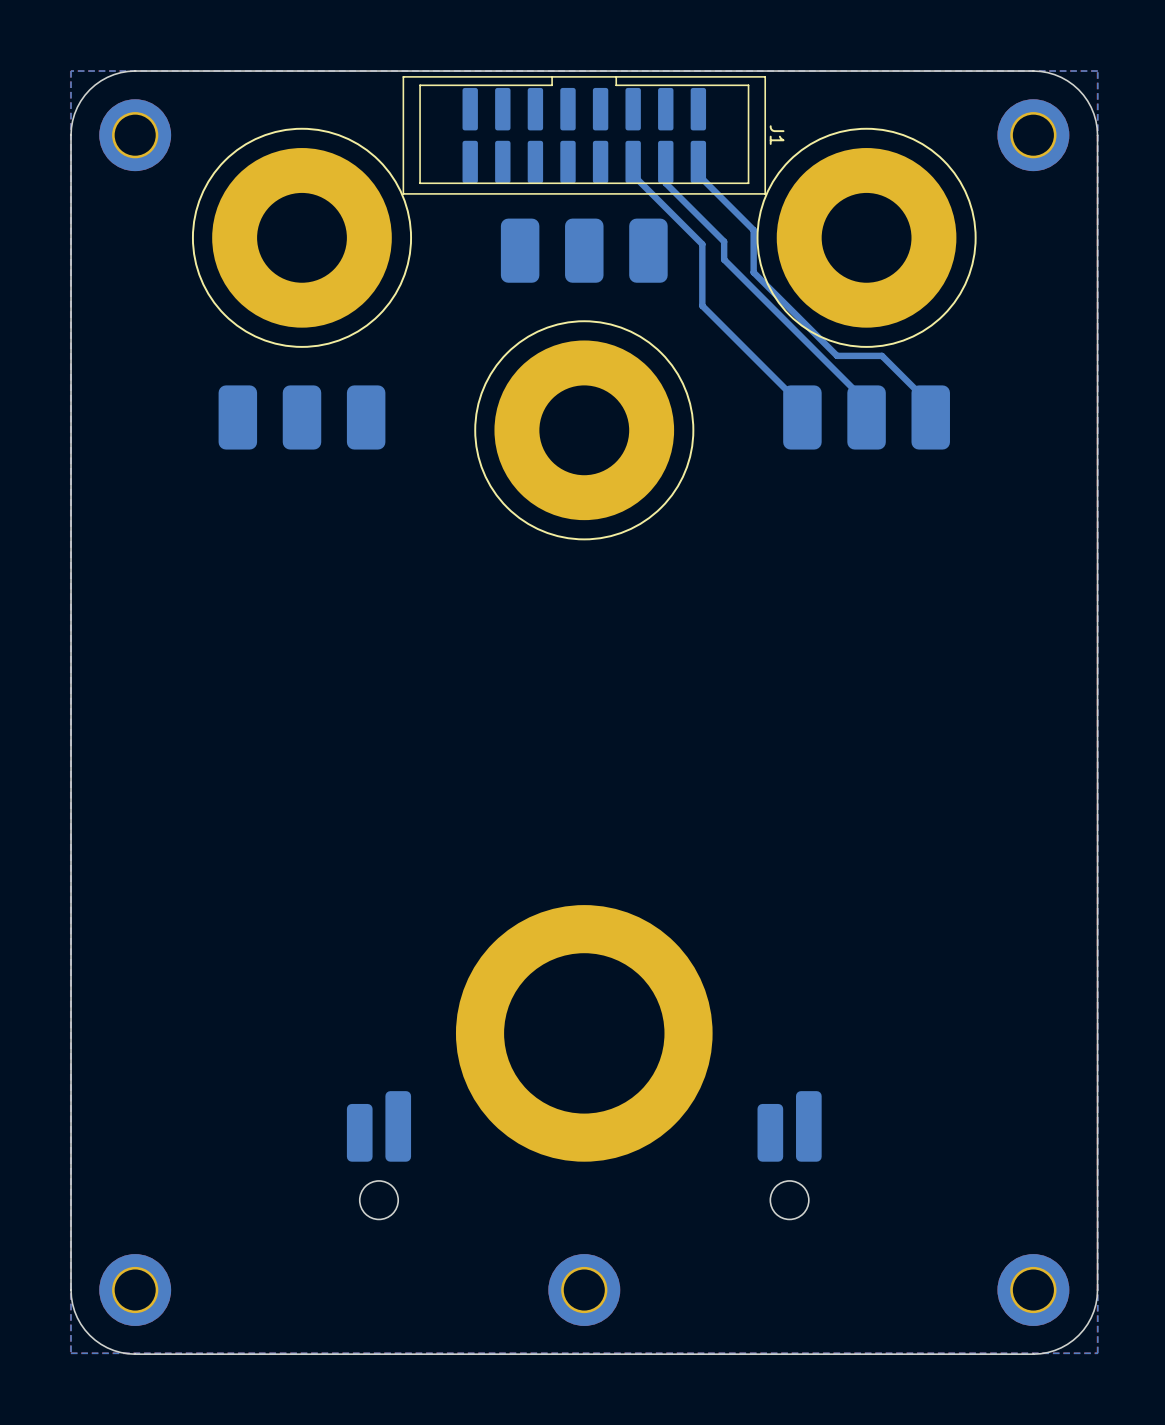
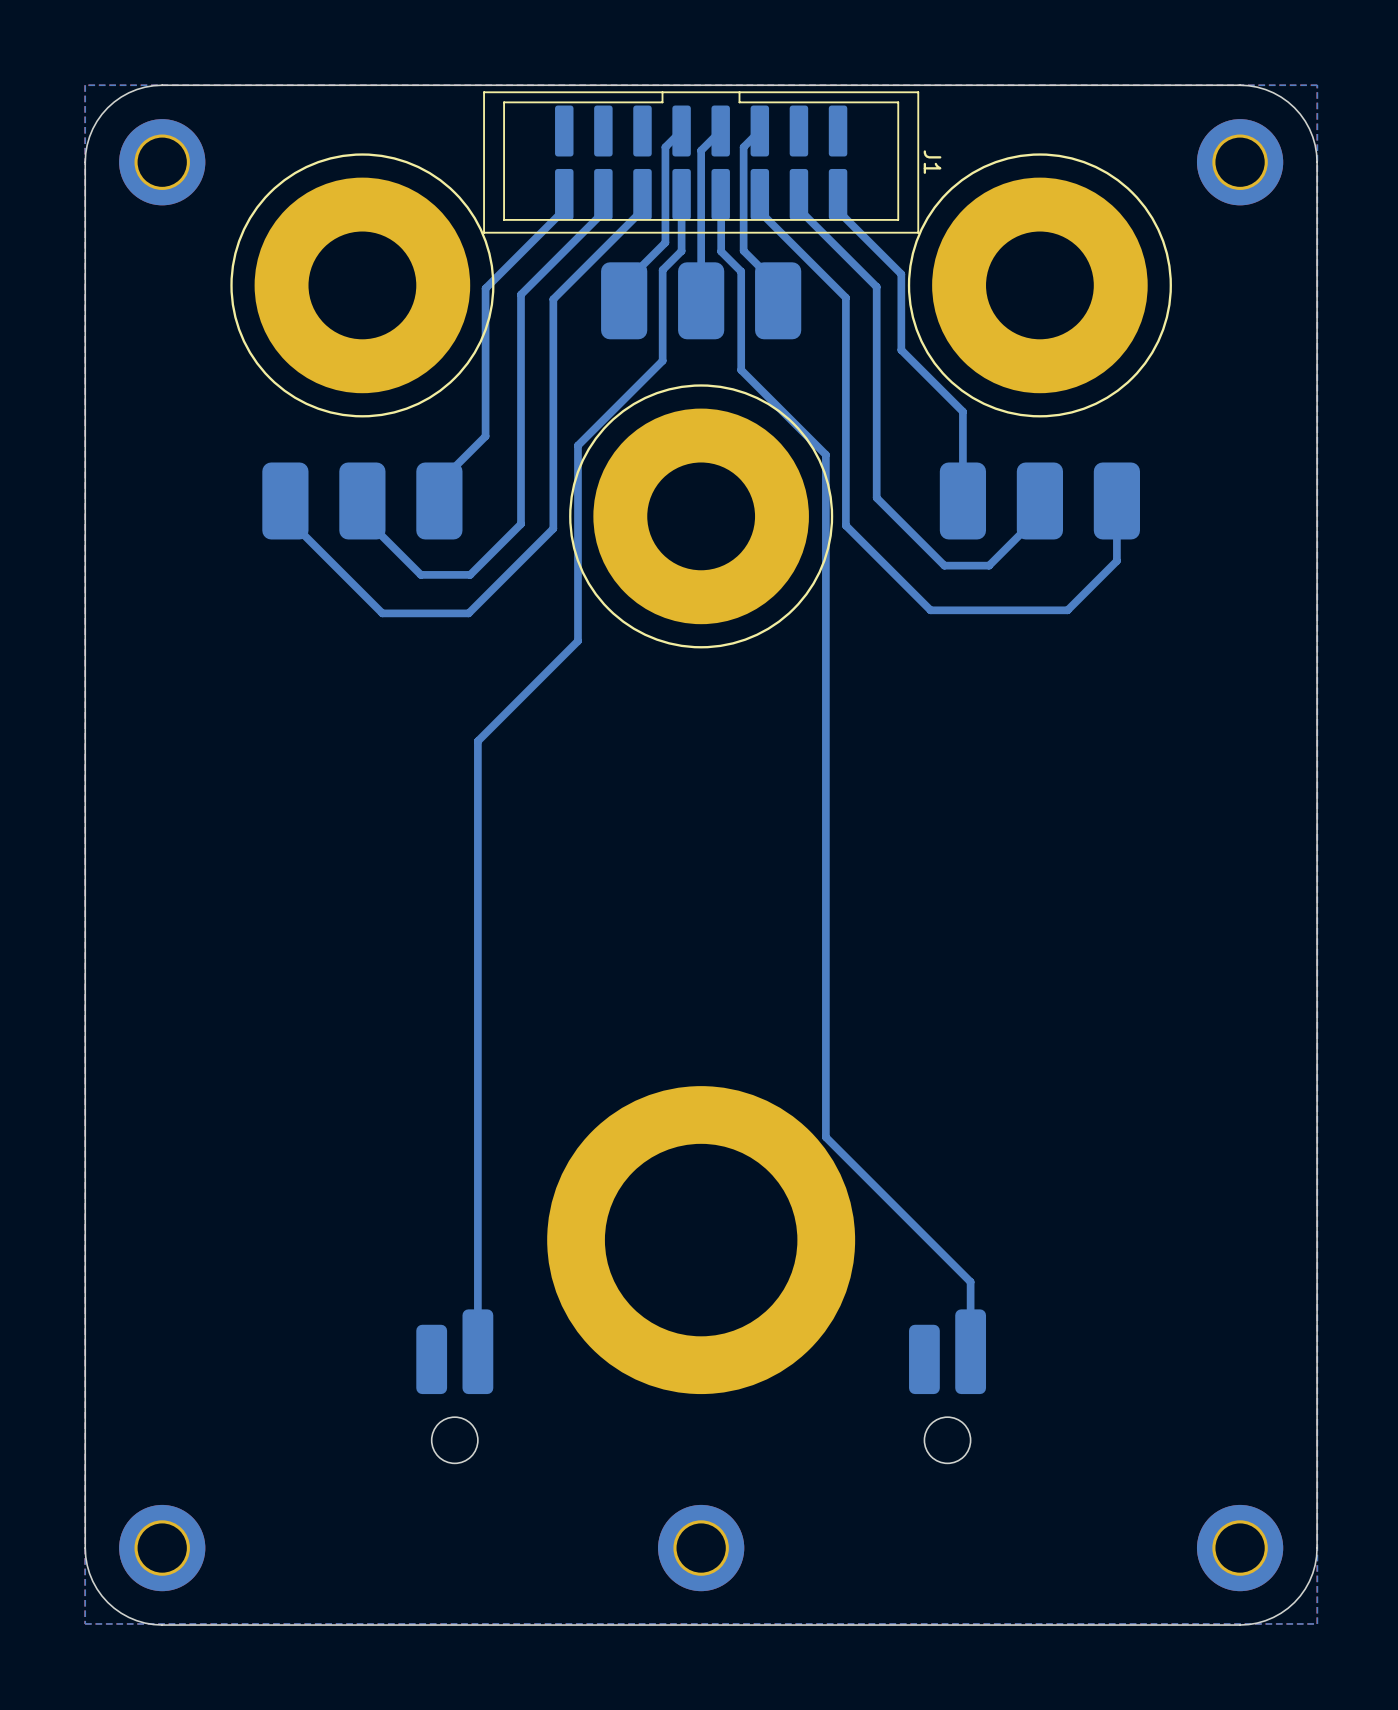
bottom track: none -> (681, 131) (665, 147) (665, 242) (624, 283) (624, 300)
bottom track: none -> (720, 131) (701, 150) (701, 300)
bottom track: none -> (759, 131) (743, 147) (743, 250) (778, 285)
bottom track: none -> (564, 194) (564, 209) (485, 288) (485, 436) (439, 482) (439, 500)
bottom track: none -> (603, 194) (603, 212) (521, 294) (521, 524) (470, 574) (420, 574) (362, 516) (362, 500)
bottom track: none -> (642, 194) (642, 210) (553, 299) (553, 528) (468, 613) (382, 613) (285, 516) (285, 500)
bottom track: none -> (681, 194) (681, 251) (662, 270) (662, 360) (577, 445) (577, 641) (477, 741) (477, 1351)
bottom track: none -> (720, 194) (721, 251) (741, 271) (741, 370) (825, 454) (825, 1137) (970, 1281) (970, 1351)
bottom track: (665, 174) (665, 183) (724, 241) (724, 259) (866, 402) (866, 417) -> (798, 209) (876, 286) (876, 497) (944, 565) (989, 565) (1039, 514) (1039, 500)
bottom track: (698, 174) (753, 230) (753, 272) (837, 355) (881, 355) (930, 404) (930, 417) -> (759, 210) (845, 297) (845, 525) (930, 610) (1067, 610) (1116, 561) (1116, 500)
bottom track: (633, 175) (702, 244) (702, 305) (802, 405) -> (838, 209) (901, 274) (901, 350) (962, 411) (962, 487)

